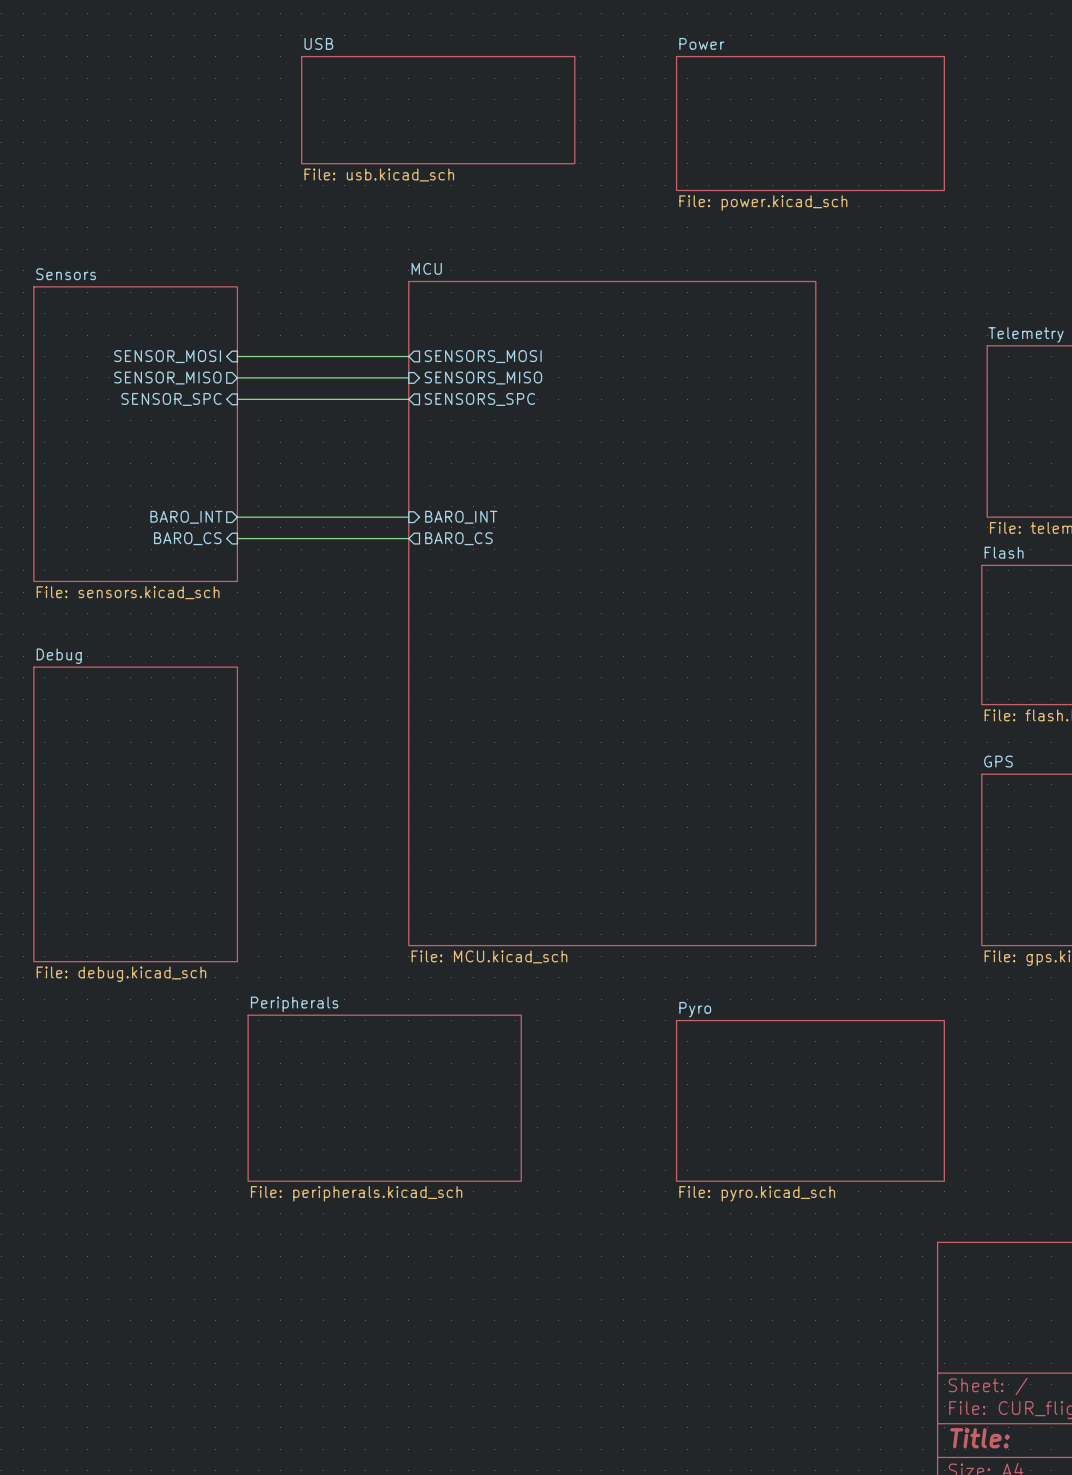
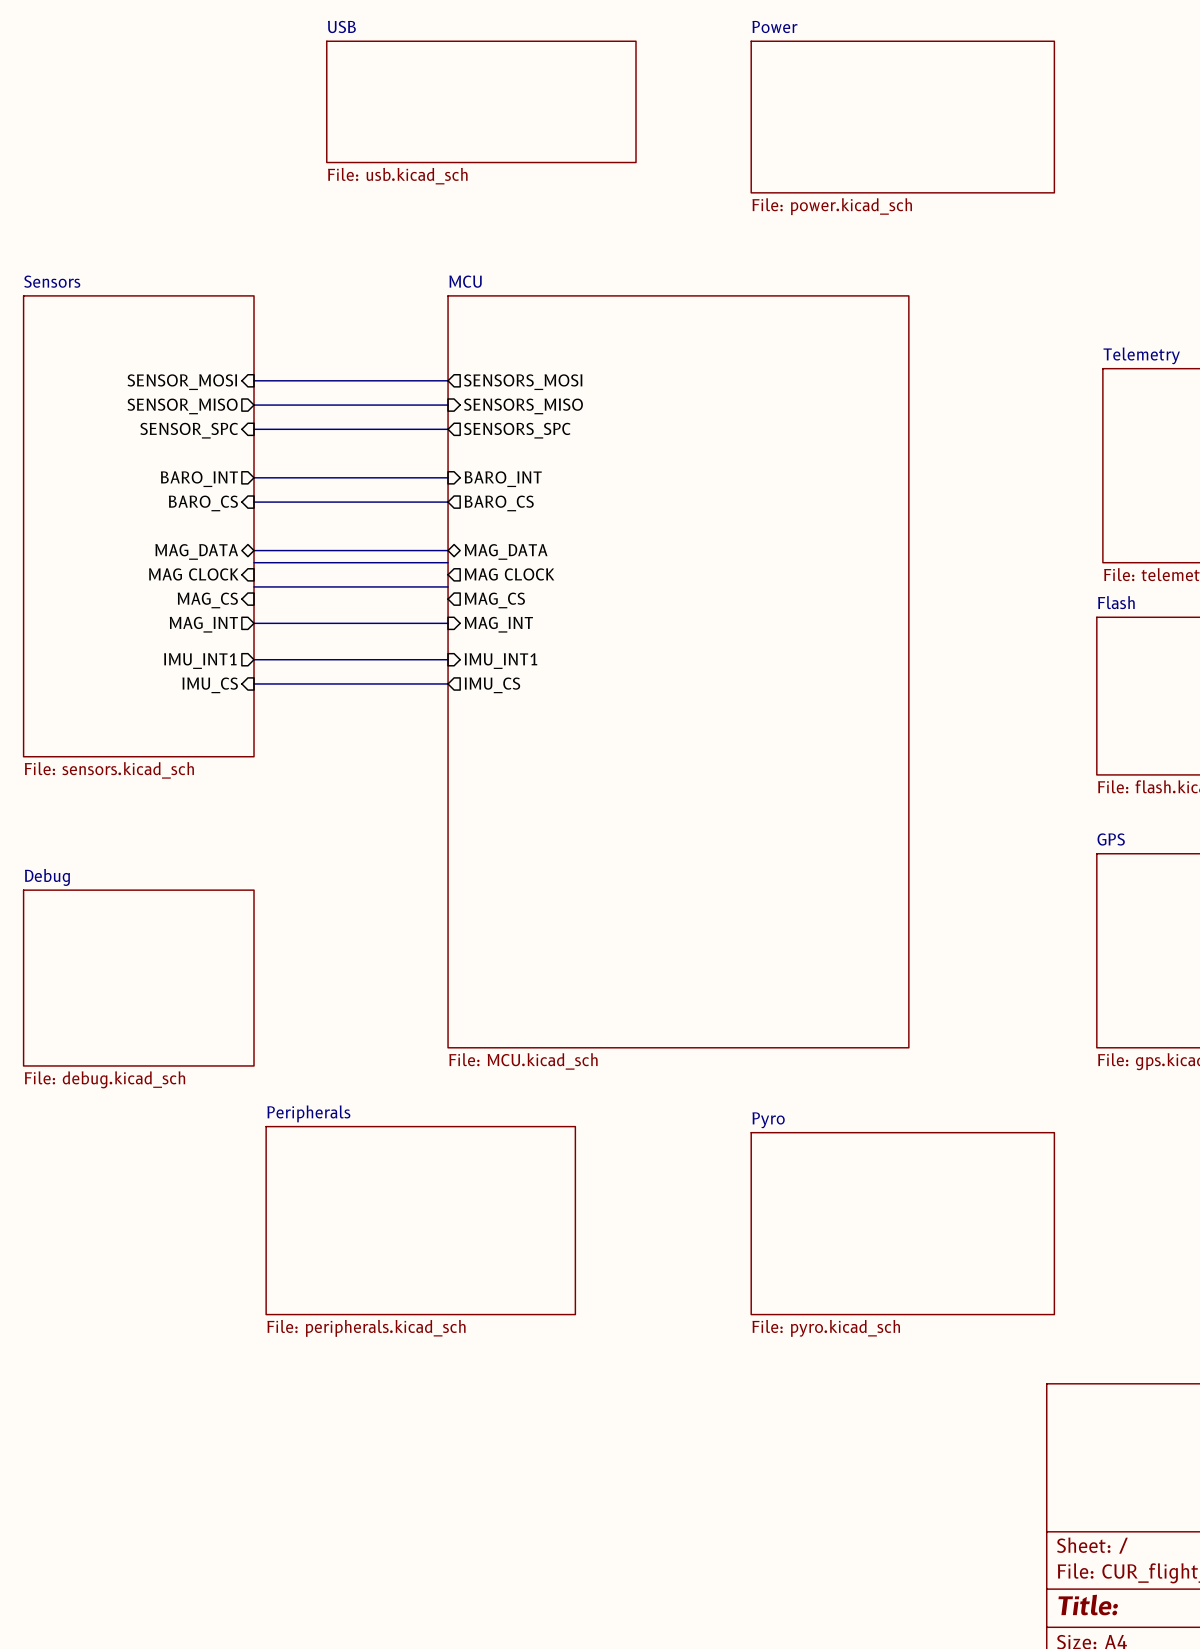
sheet Sensors: File: sensors.kicad_sch (135, 434) -> none
wire: none -> (254, 477) (448, 477)
wire: none -> (254, 502) (448, 502)
sheet Sensors: none -> File: sensors.kicad_sch (138, 526)
sheet pin: none -> MAG_DATA (196, 551)
wire: none -> (254, 550) (448, 550)
sheet pin: none -> MAG_DATA (506, 551)
sheet pin position: BARO_INT (186, 517) -> BARO_INT (199, 479)
sheet pin position: BARO_INT (461, 517) -> BARO_INT (503, 479)
sheet pin: none -> MAG CLOCK (193, 574)
sheet pin: none -> MAG CLOCK (509, 574)
sheet pin position: BARO_CS (187, 538) -> BARO_CS (203, 503)
sheet pin position: BARO_CS (458, 538) -> BARO_CS (499, 503)
sheet pin: none -> MAG_CS (207, 600)
sheet pin: none -> MAG_CS (494, 600)
sheet pin: none -> MAG_INT (203, 624)
wire: none -> (254, 623) (448, 623)
sheet pin: none -> MAG_INT (498, 624)
sheet pin: none -> IMU_INT1 (200, 661)
wire: none -> (254, 659) (448, 659)
sheet pin: none -> IMU_INT1 (500, 661)
sheet pin: none -> IMU_CS (210, 685)
wire: none -> (254, 683) (448, 683)
sheet pin: none -> IMU_CS (492, 685)
sheet Debug: File: debug.kicad_sch (135, 814) -> none
sheet Debug: none -> File: debug.kicad_sch (138, 978)

